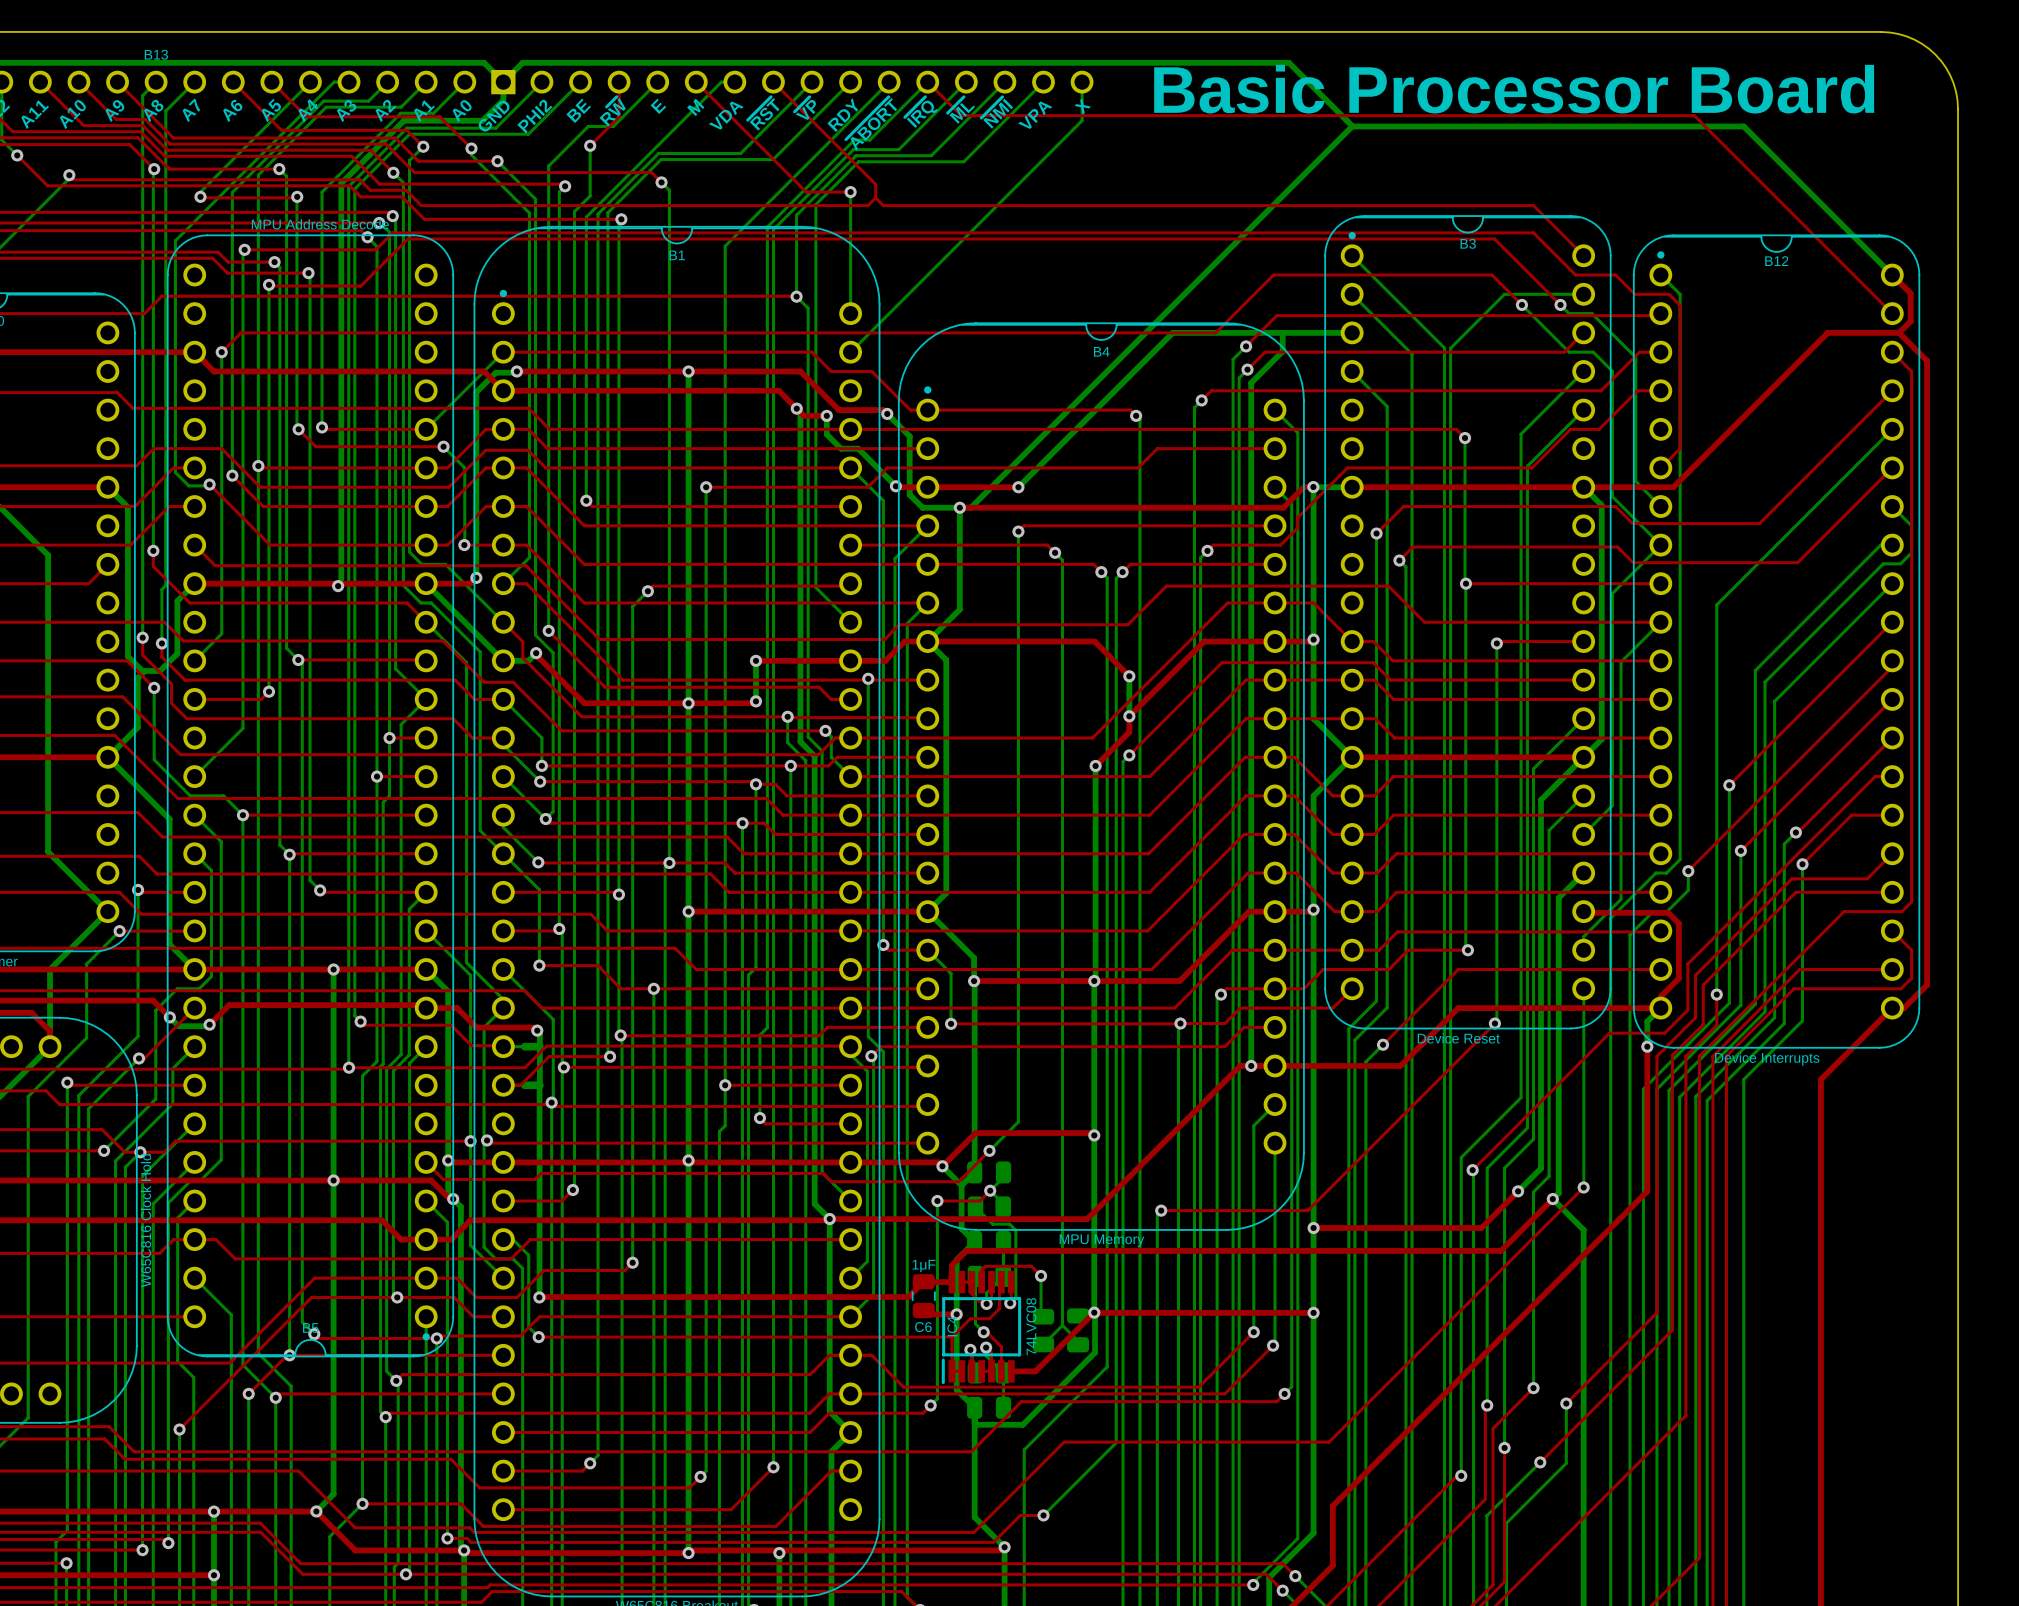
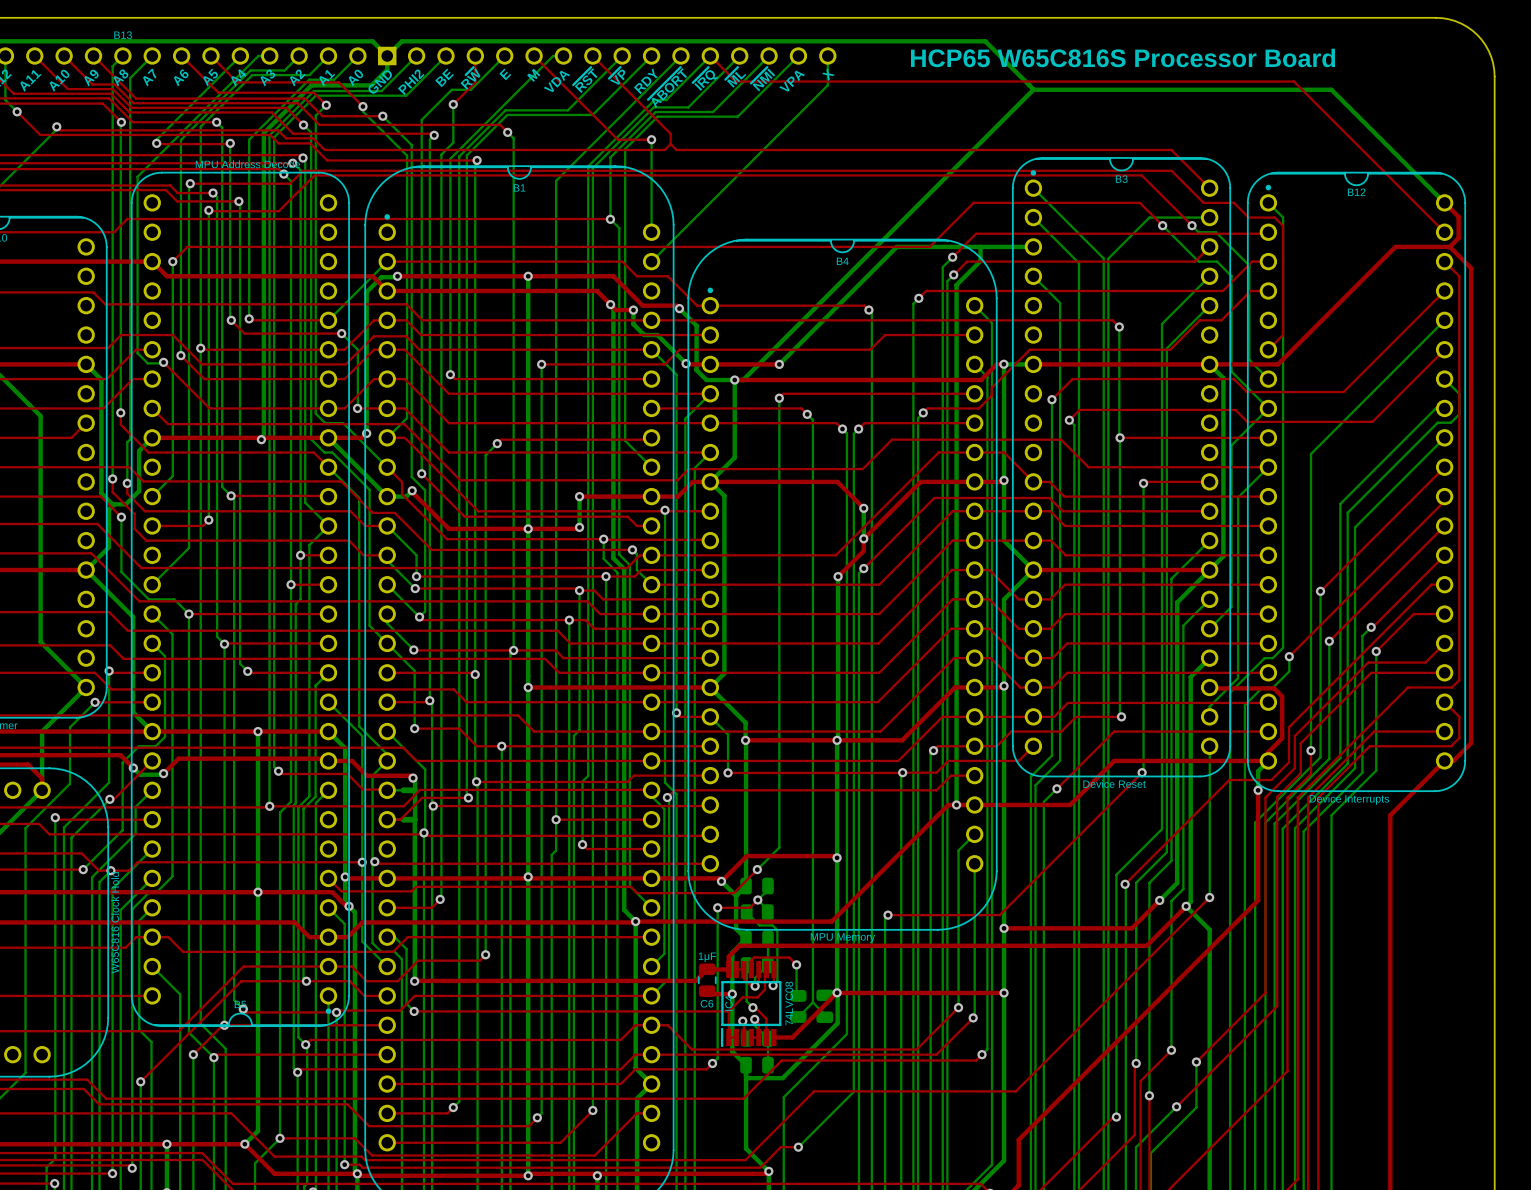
text: Basic Processor Board (1514, 89) -> HCP65 W65C816S Processor Board (1123, 57)

